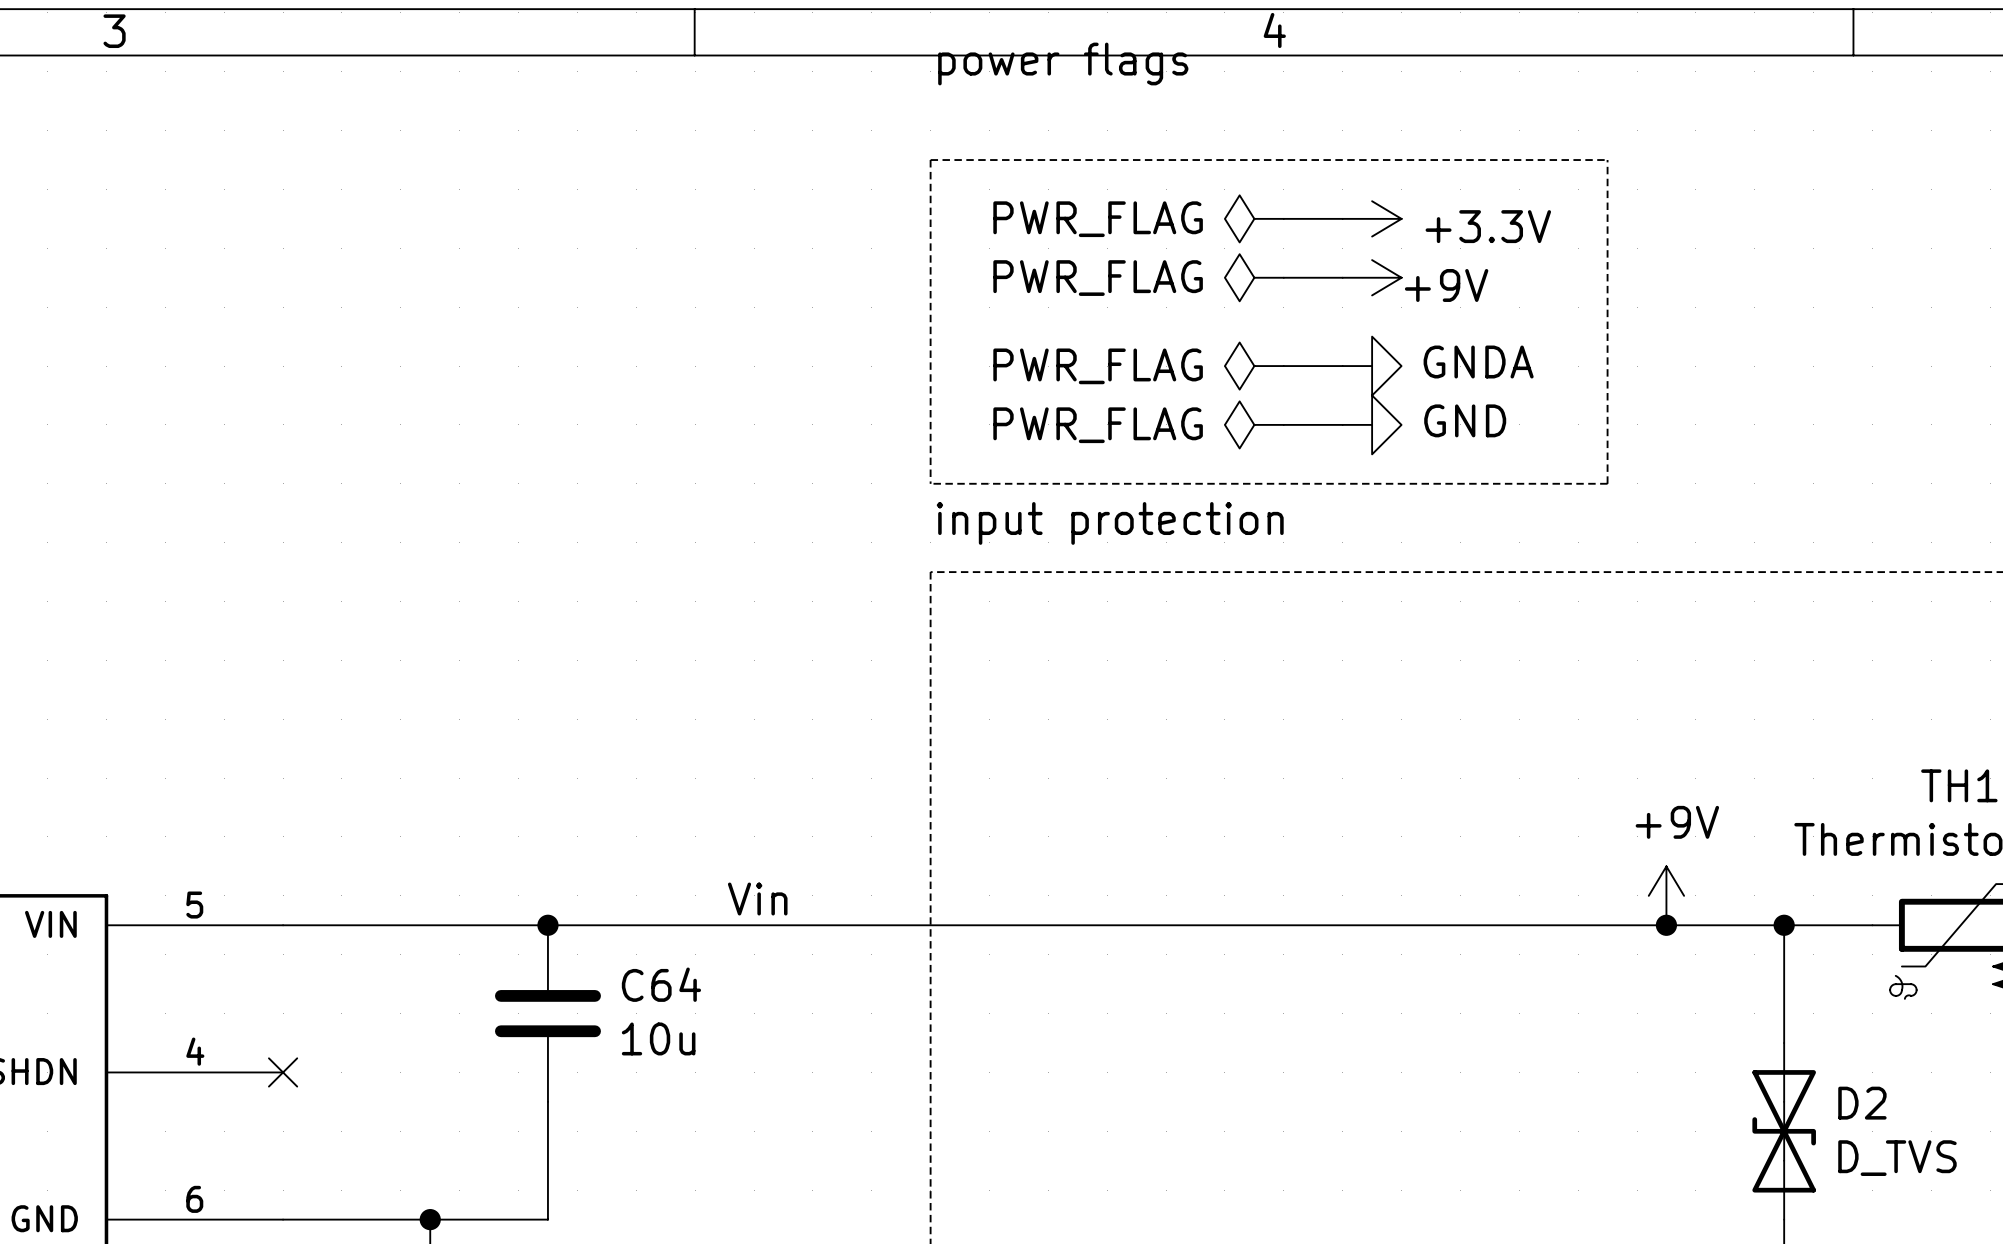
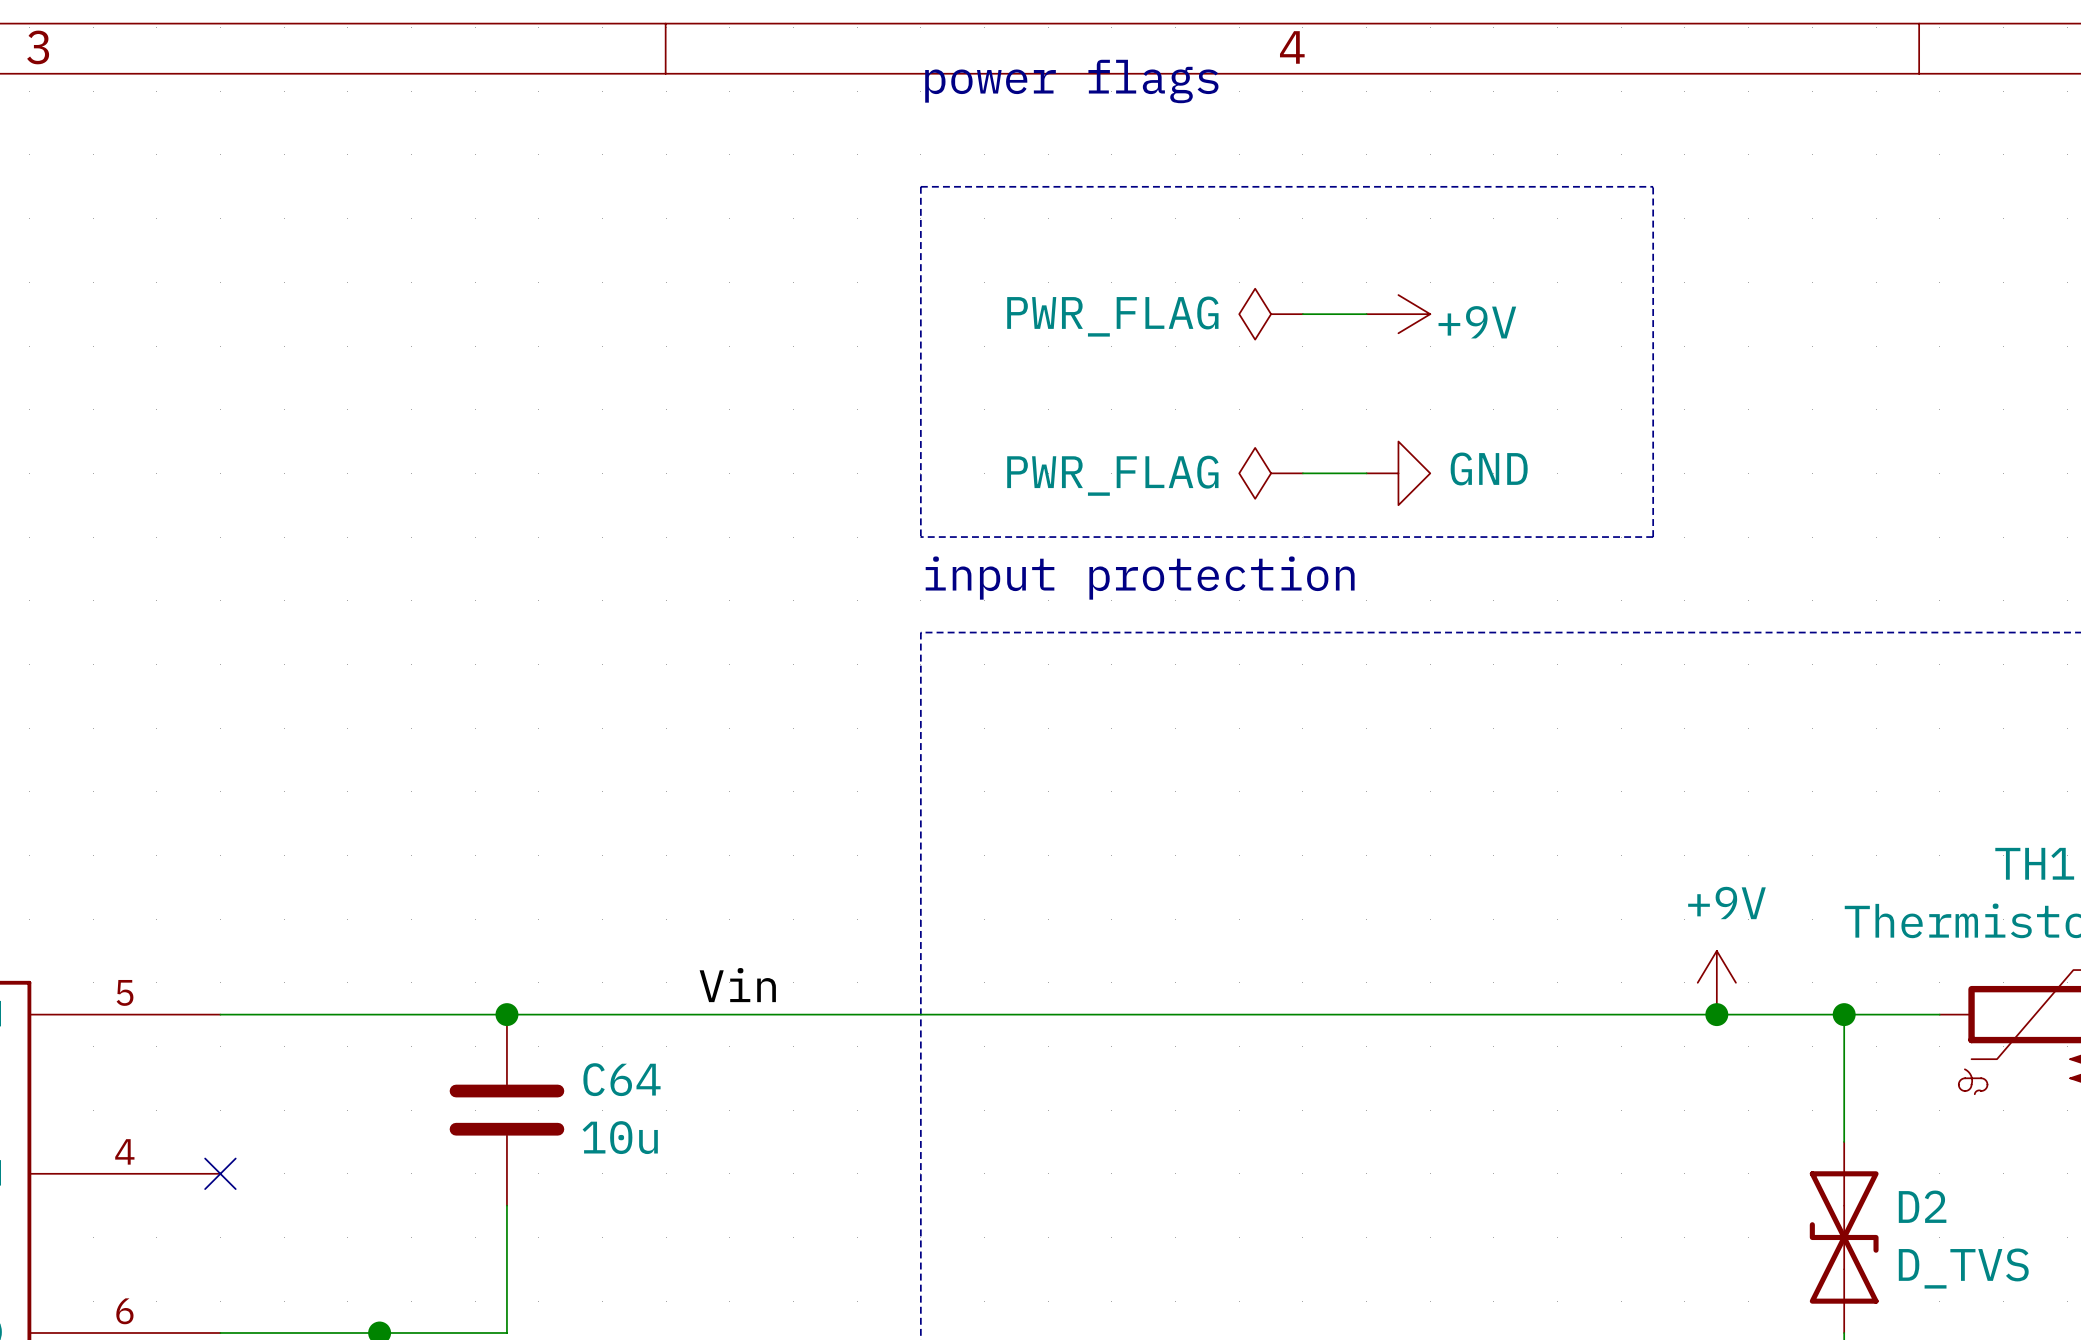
power symbol: PWR_FLAG (1254, 218) -> none
wire: (1283, 218) (1342, 218) -> none
power symbol: +3.3V (1372, 218) -> none
power symbol: PWR_FLAG (1254, 366) -> none
wire: (1283, 366) (1342, 366) -> none
power symbol: GNDA (1372, 366) -> none

